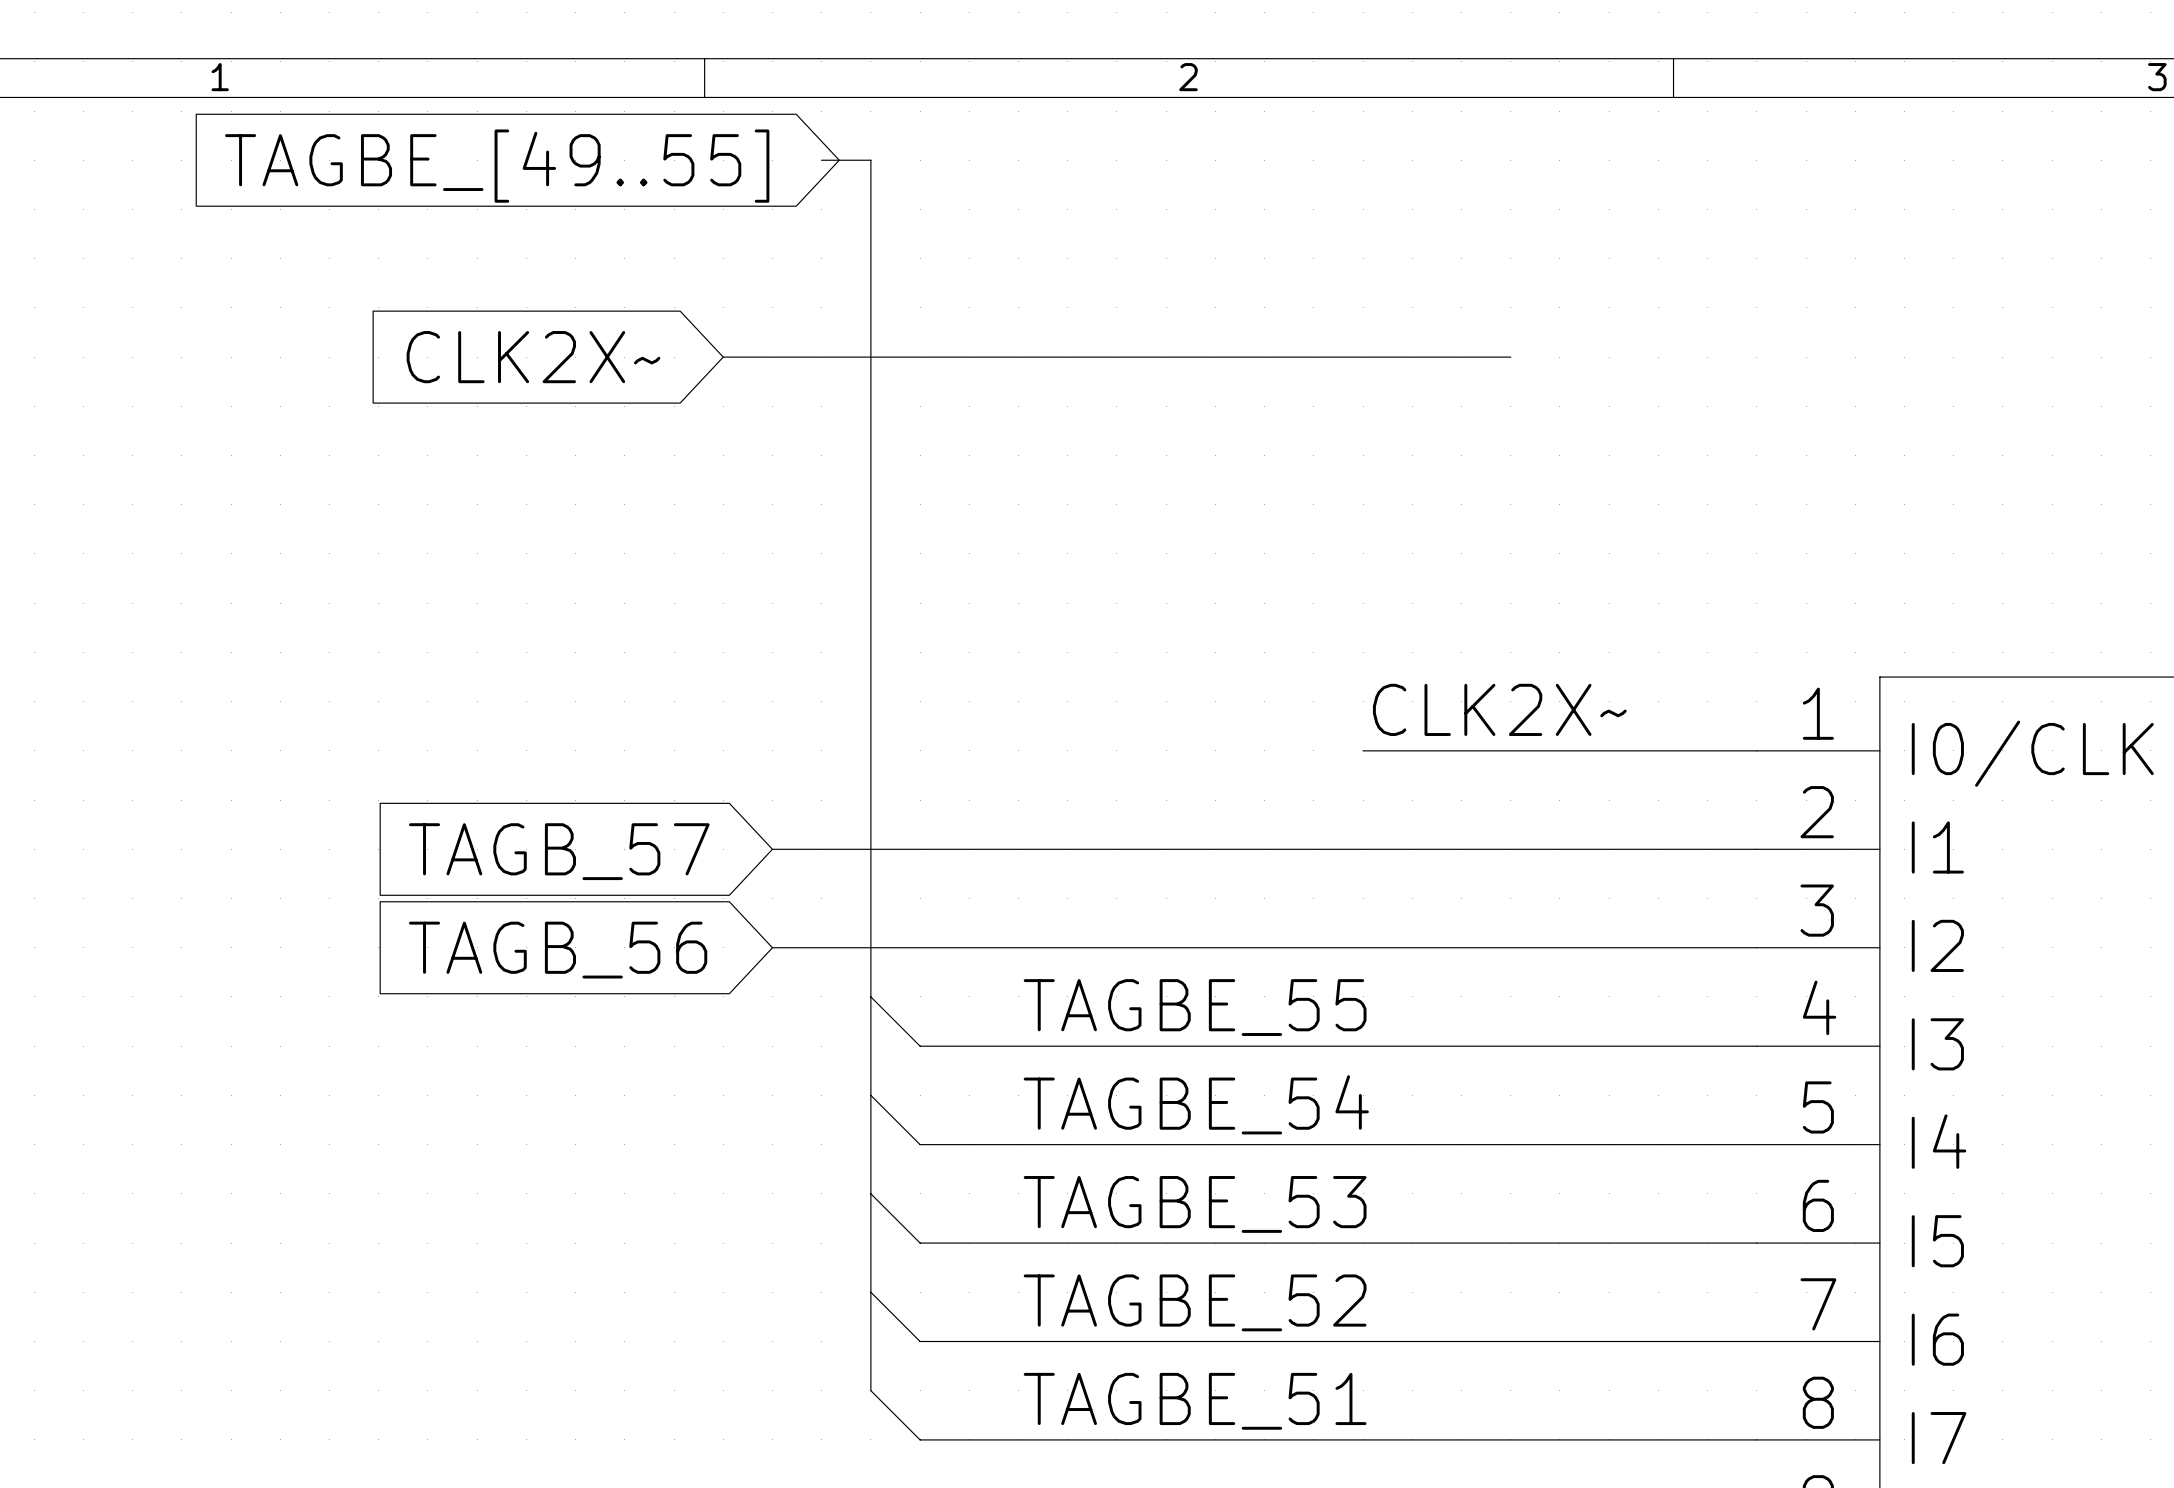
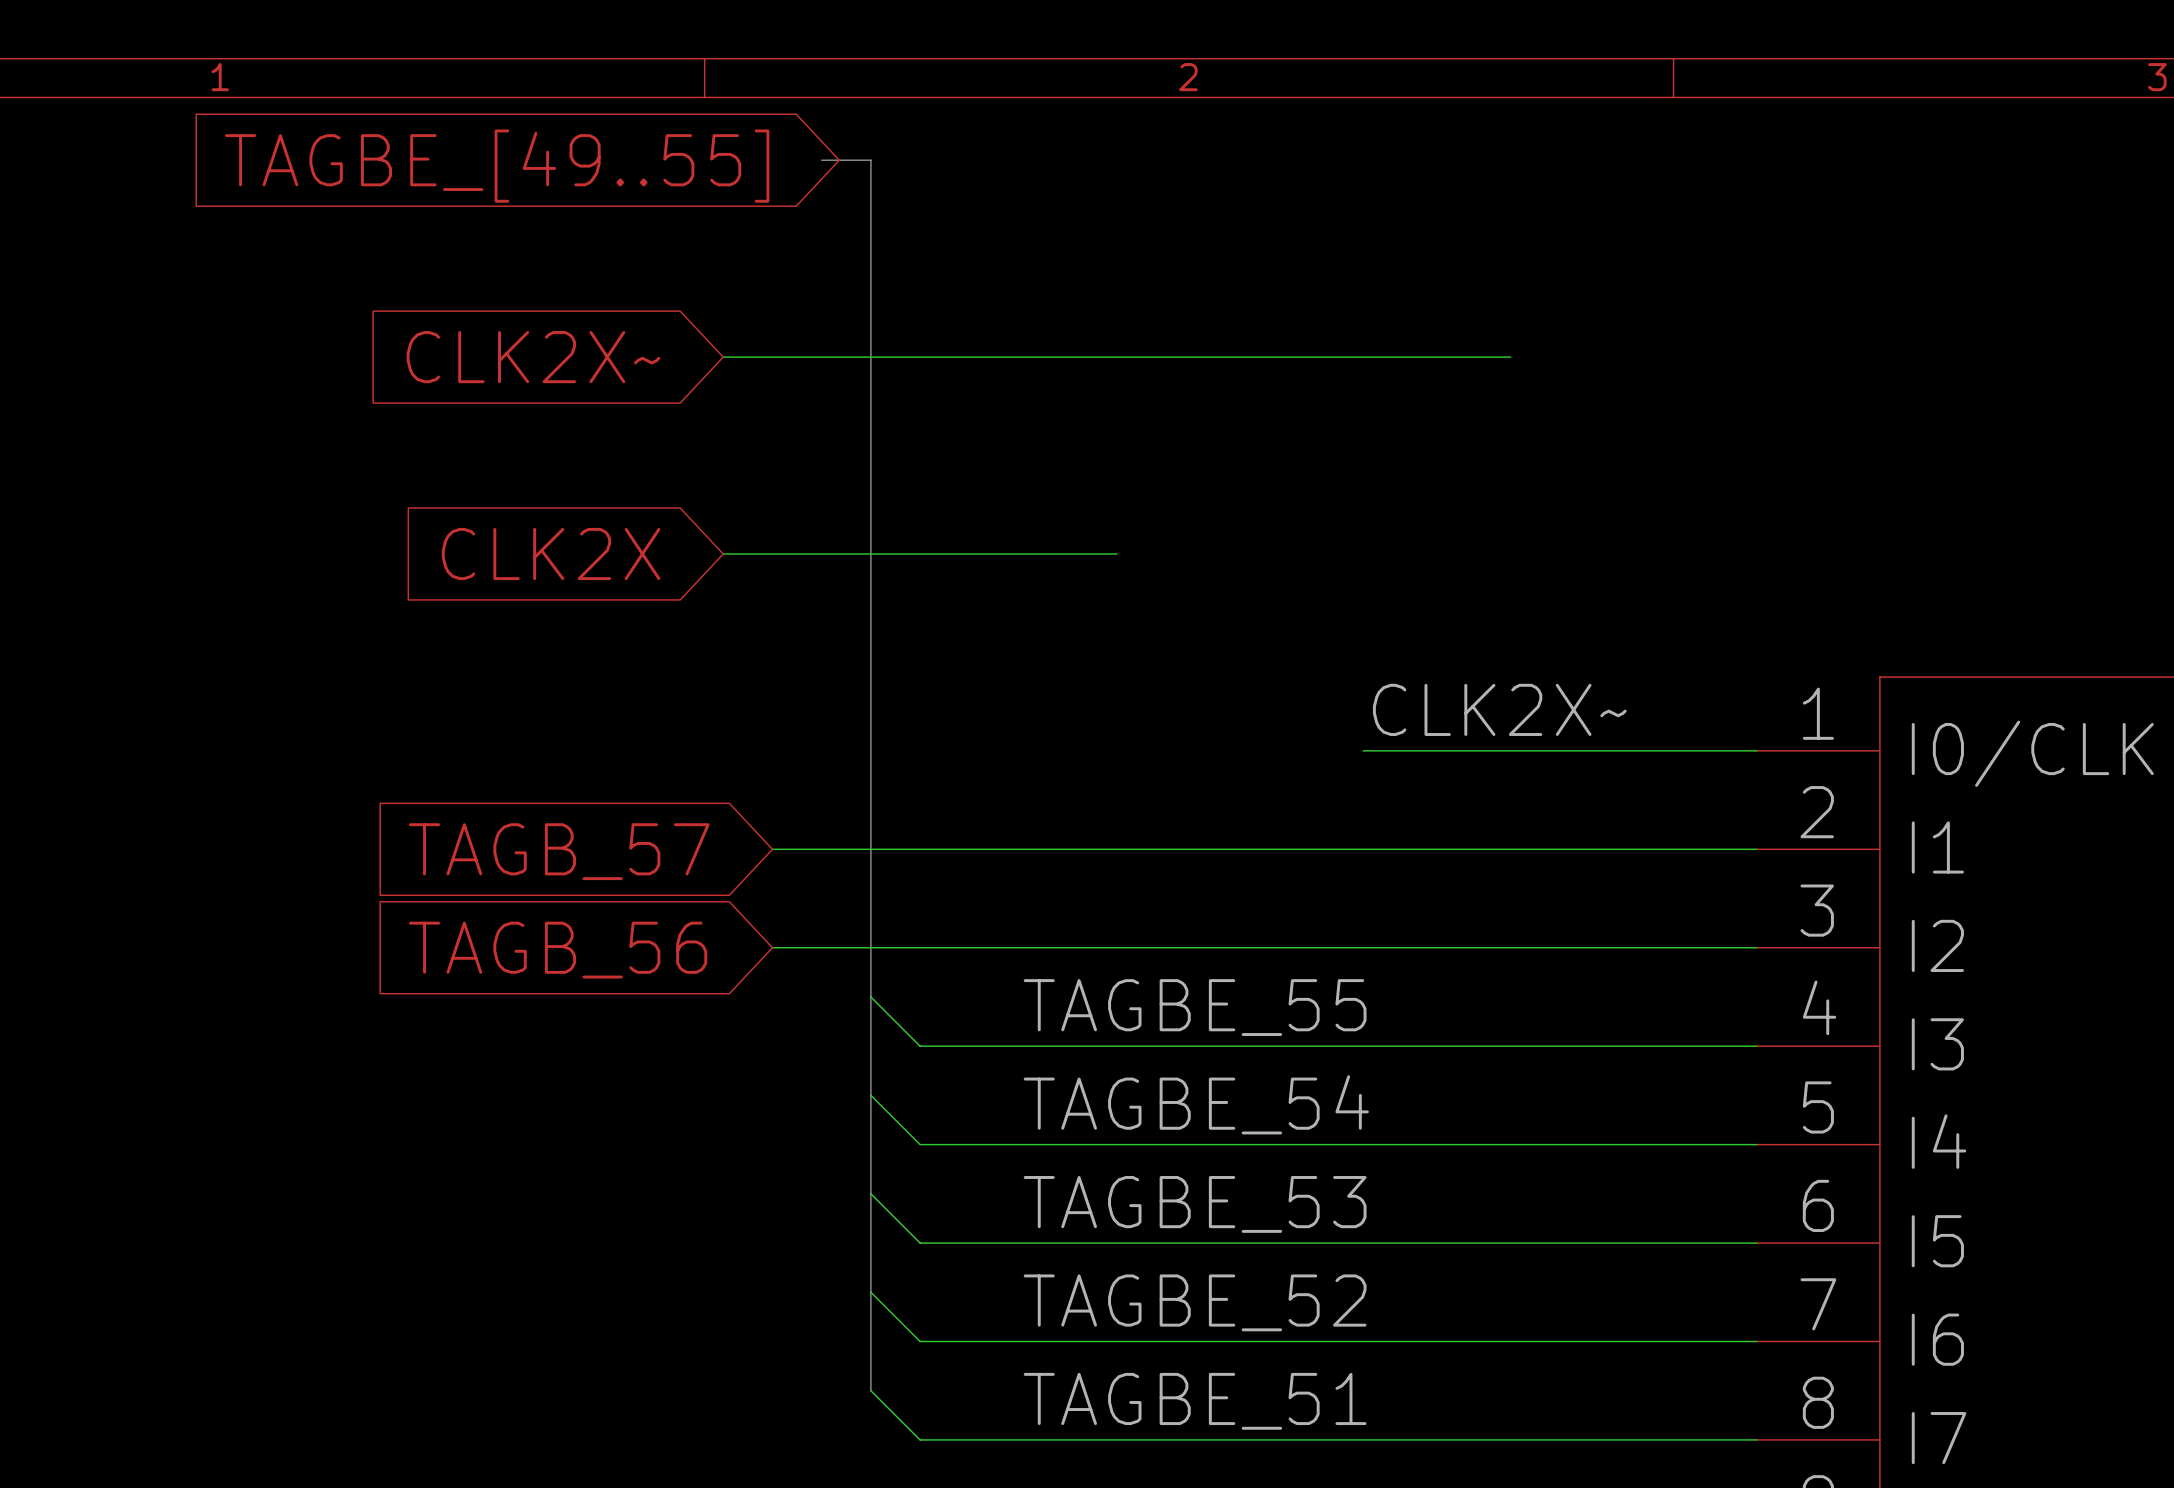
global label: none -> CLK2X (551, 553)
wire: none -> (723, 553) (1116, 553)

